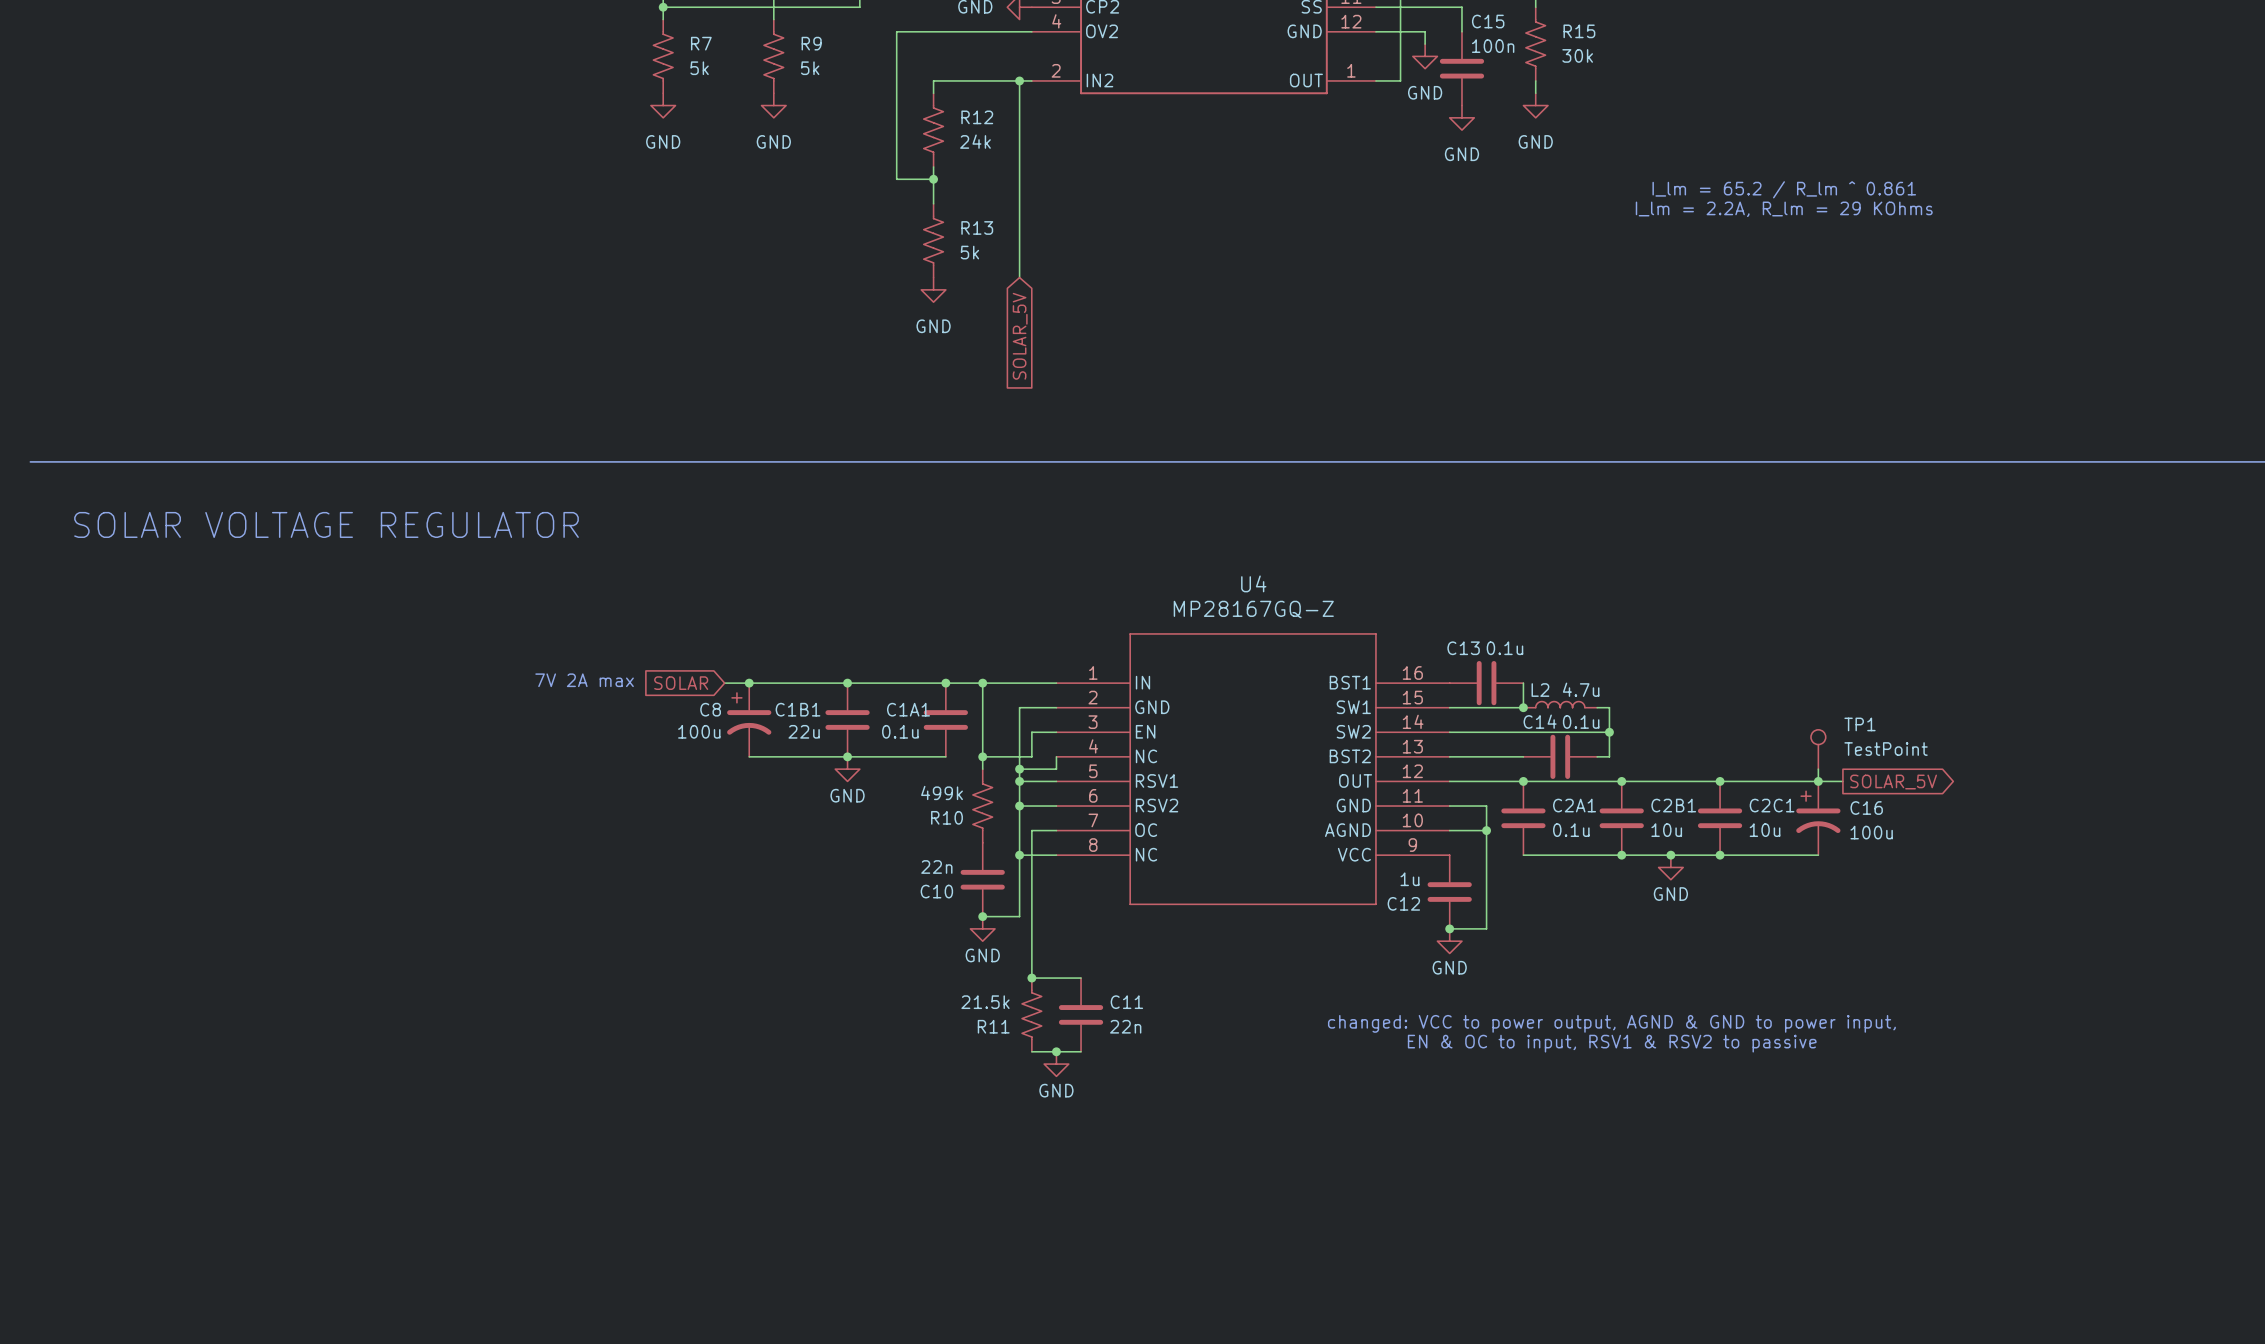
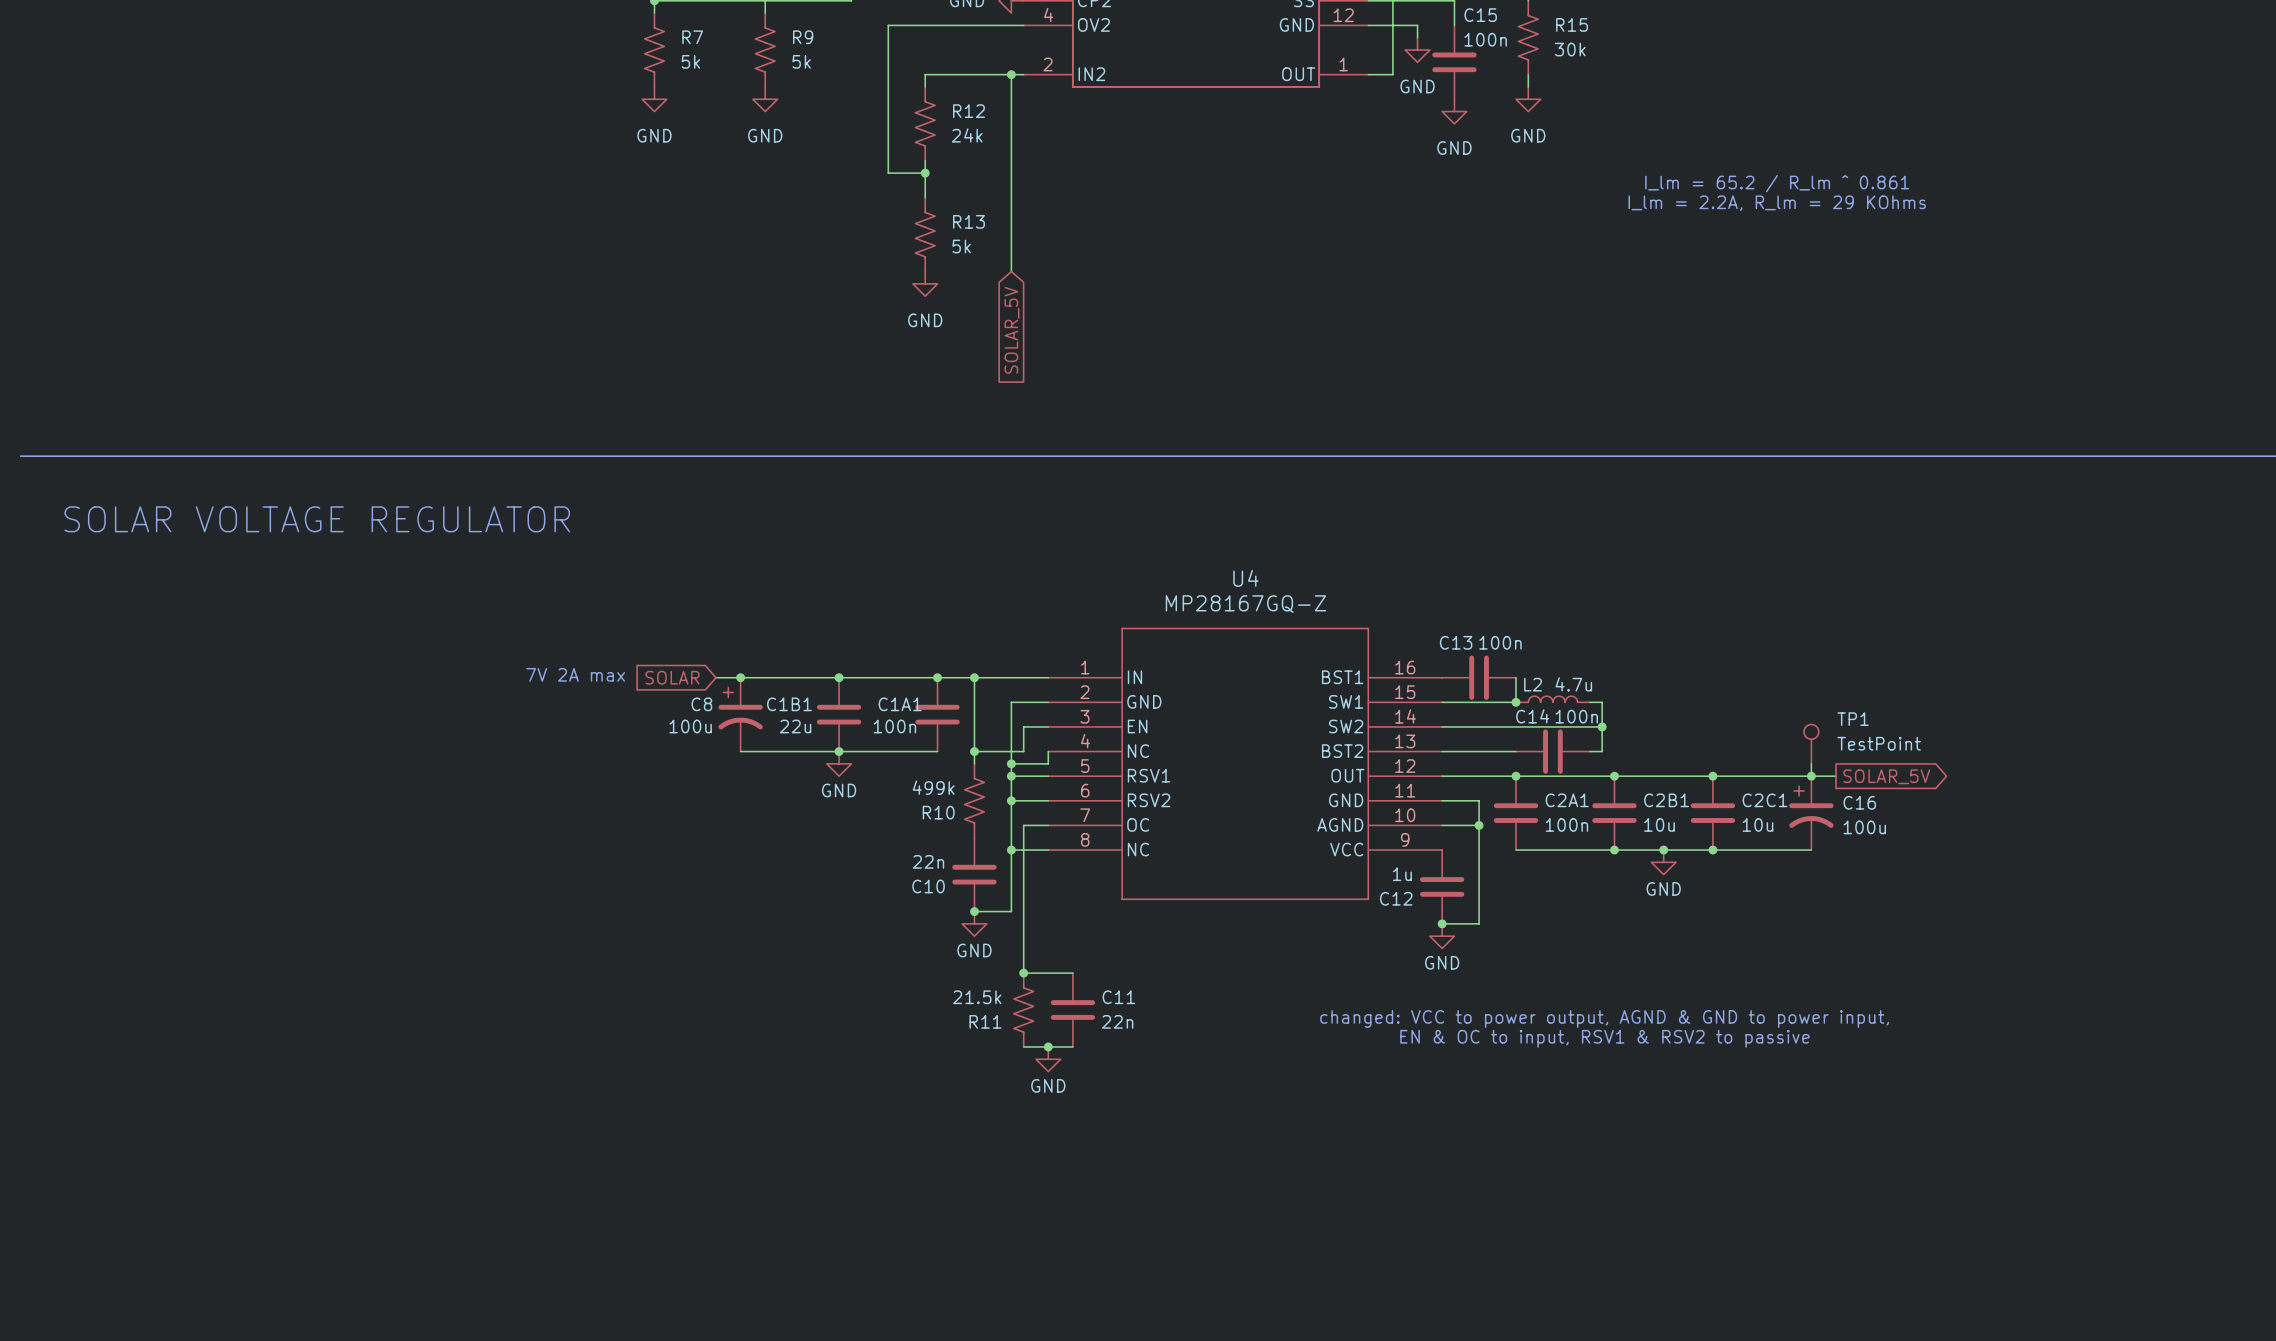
C13 value: 0.1u (1504, 648) -> 100n (1500, 642)
C14 value: 0.1u (1581, 721) -> 100n (1576, 716)
C1A1 value: 0.1u (900, 731) -> 100n (894, 726)
C2A1 value: 0.1u (1571, 830) -> 100n (1566, 824)

